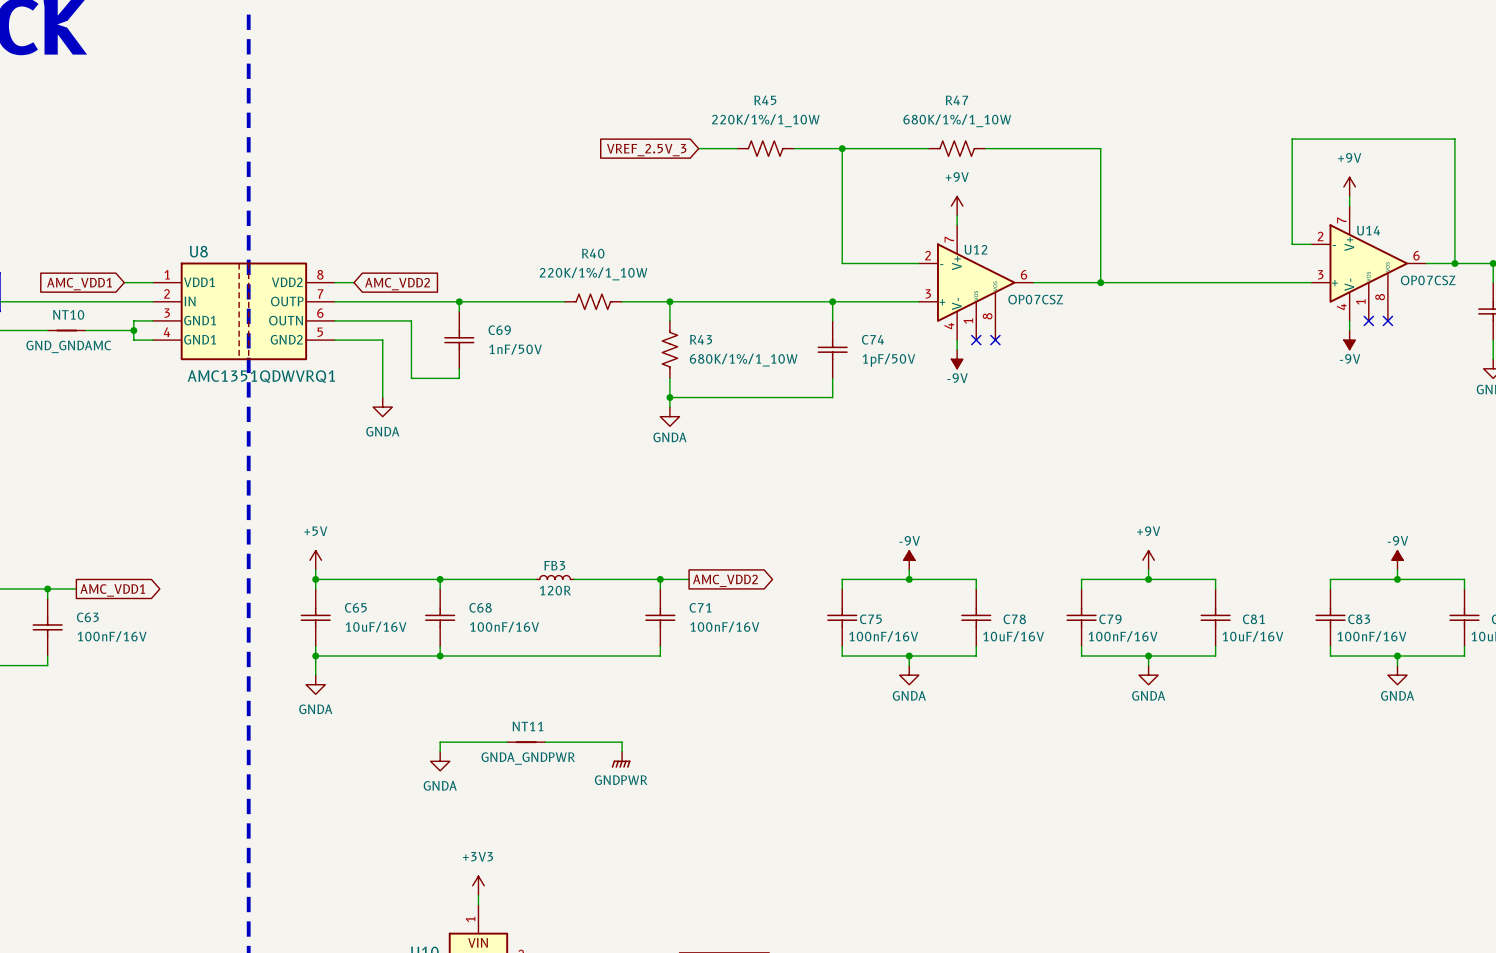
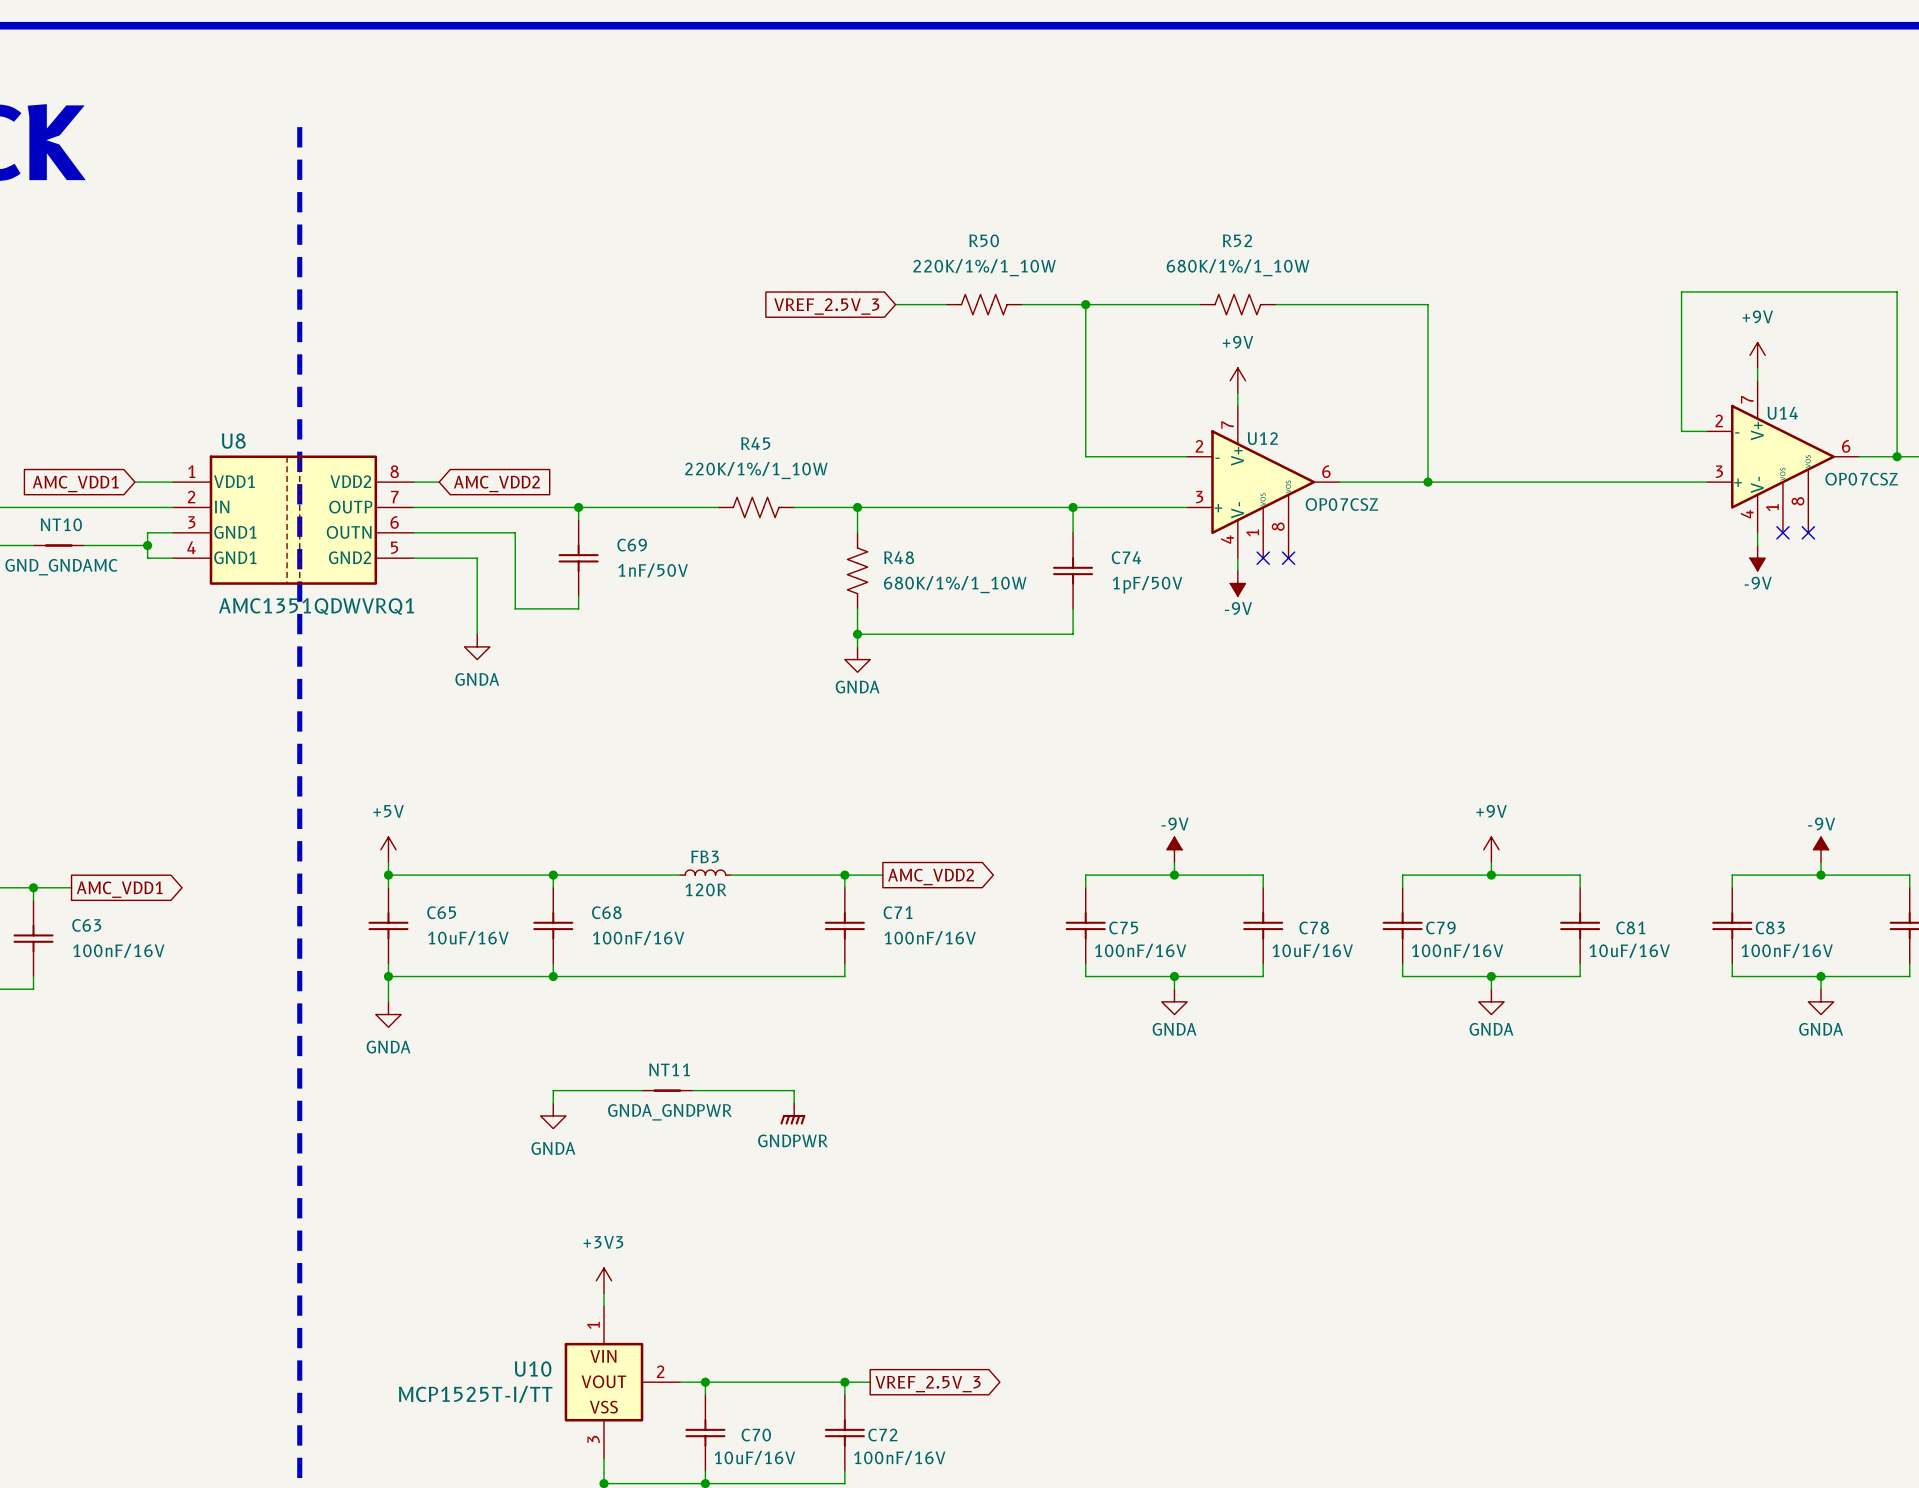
R45 name: R45 (765, 100) -> R50 (984, 240)
R47 name: R47 (956, 100) -> R52 (1237, 240)
R40 name: R40 (593, 253) -> R45 (755, 443)
R43 name: R43 (701, 339) -> R48 (899, 557)

